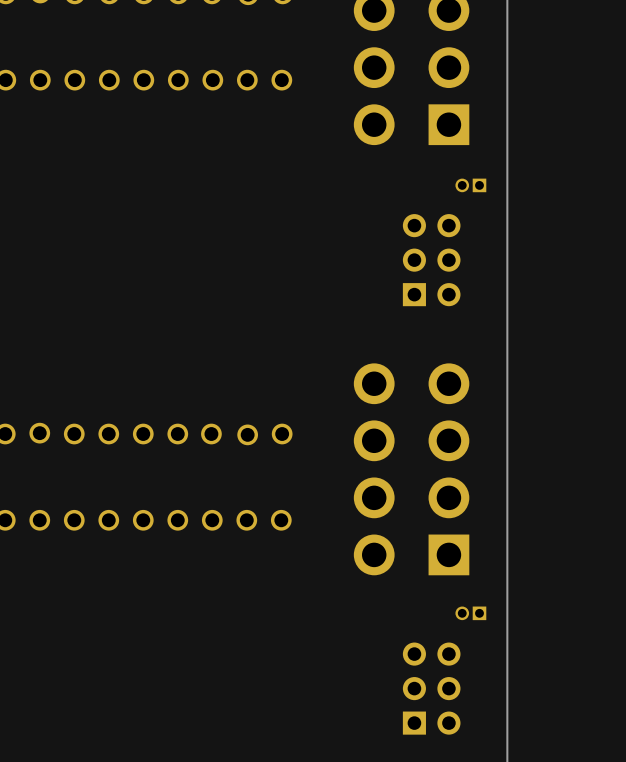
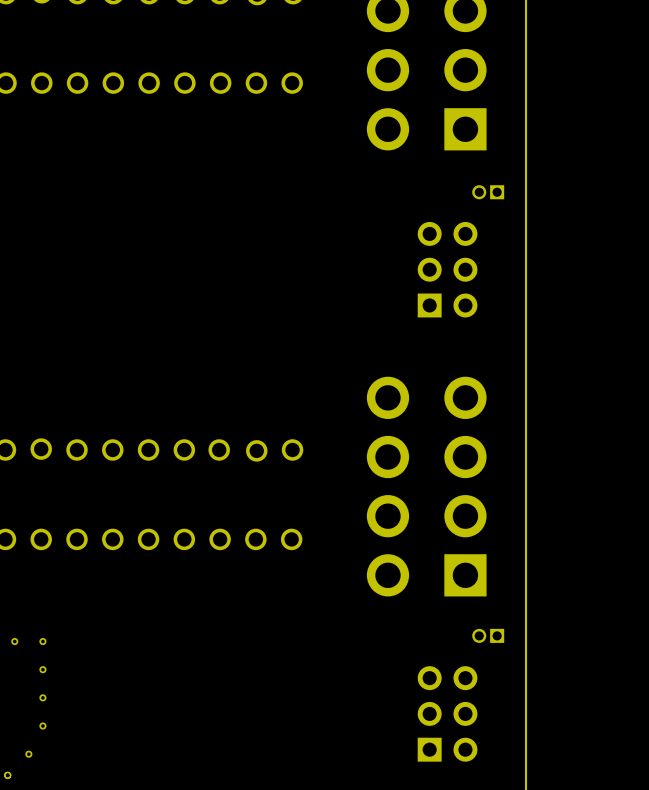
part: none -> (14, 641)
part: none -> (42, 641)
part: none -> (42, 669)
part: none -> (42, 697)
part: none -> (42, 726)
part: none -> (28, 754)
part: none -> (7, 775)

